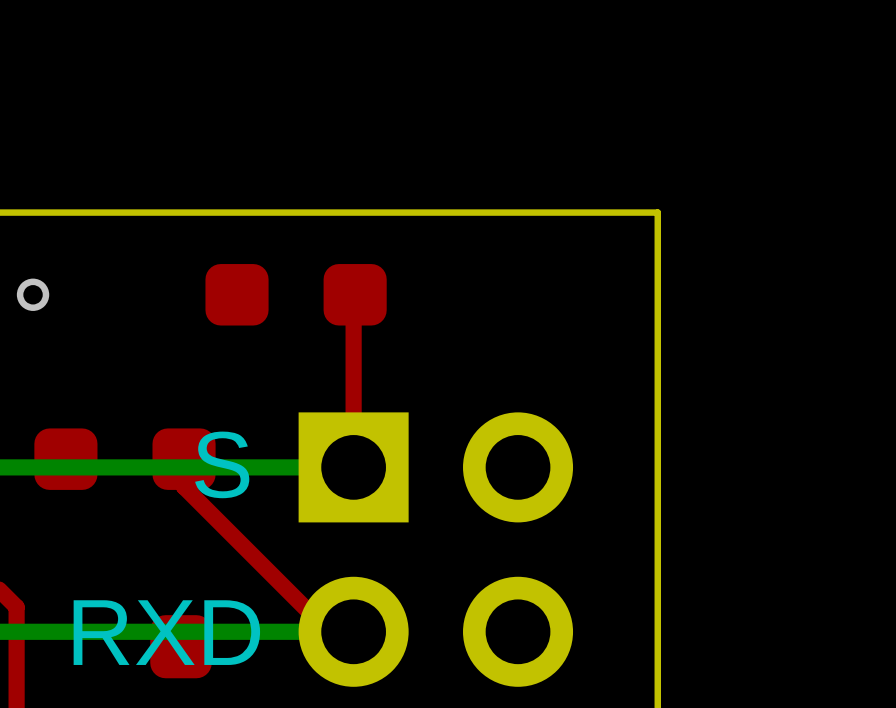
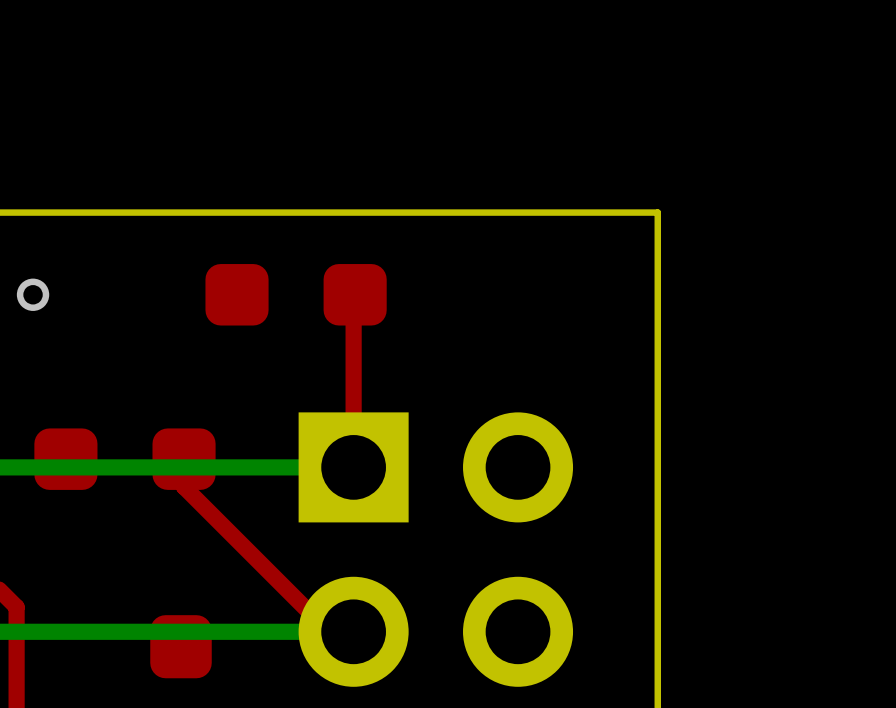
text: S (222, 464) -> none
text: RXD (166, 632) -> none

